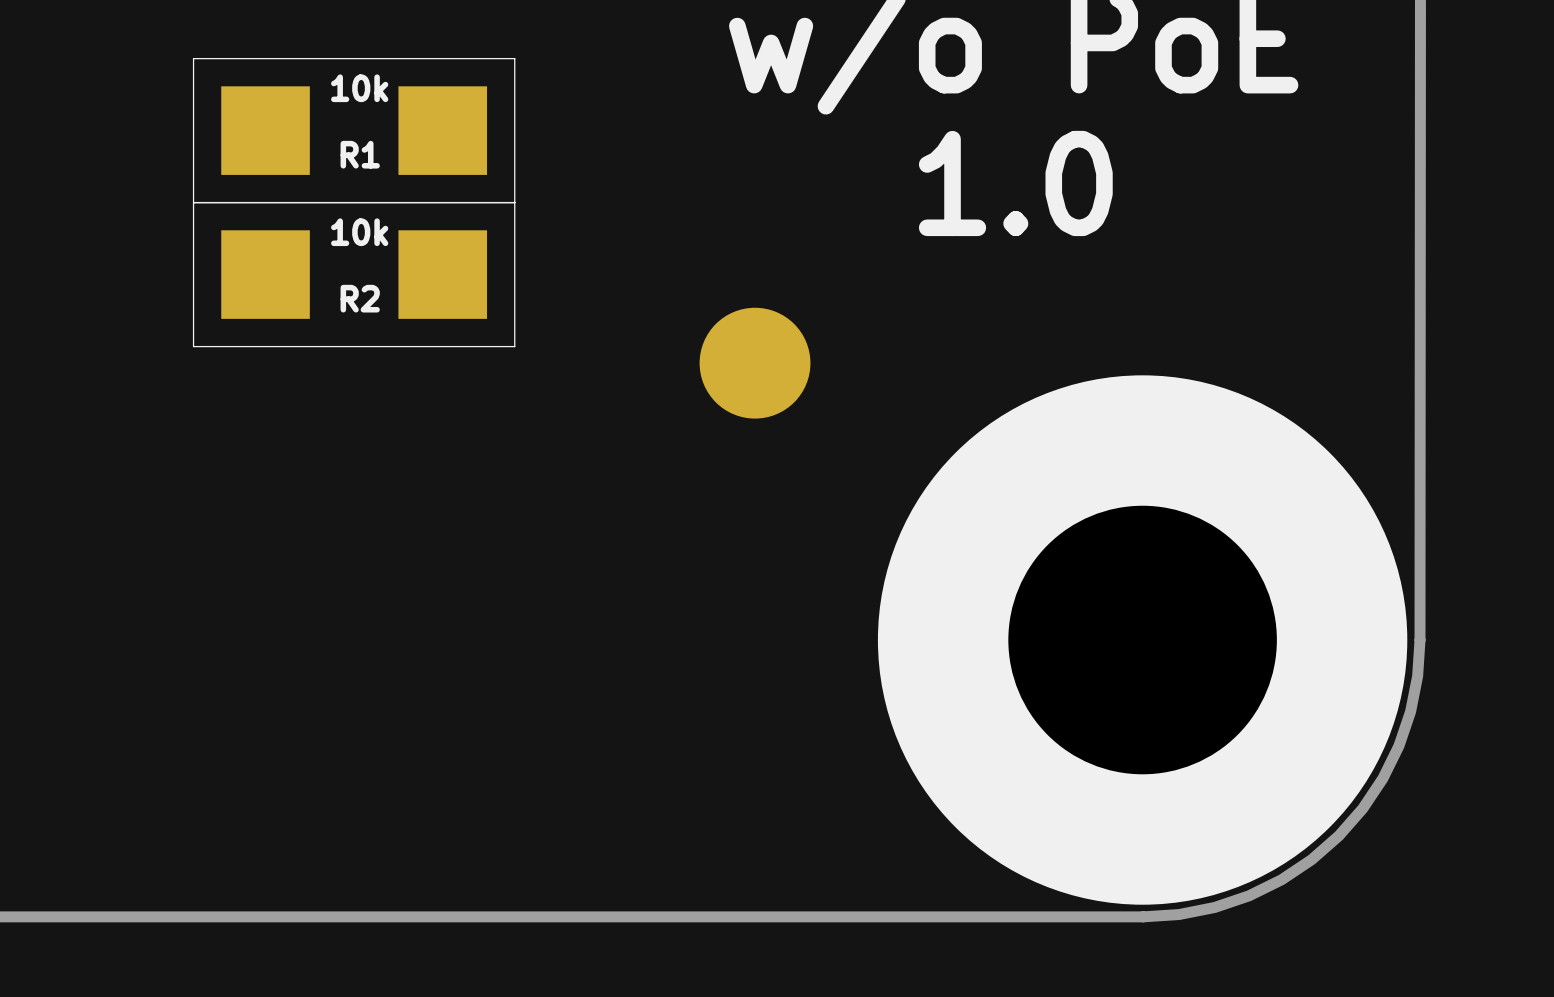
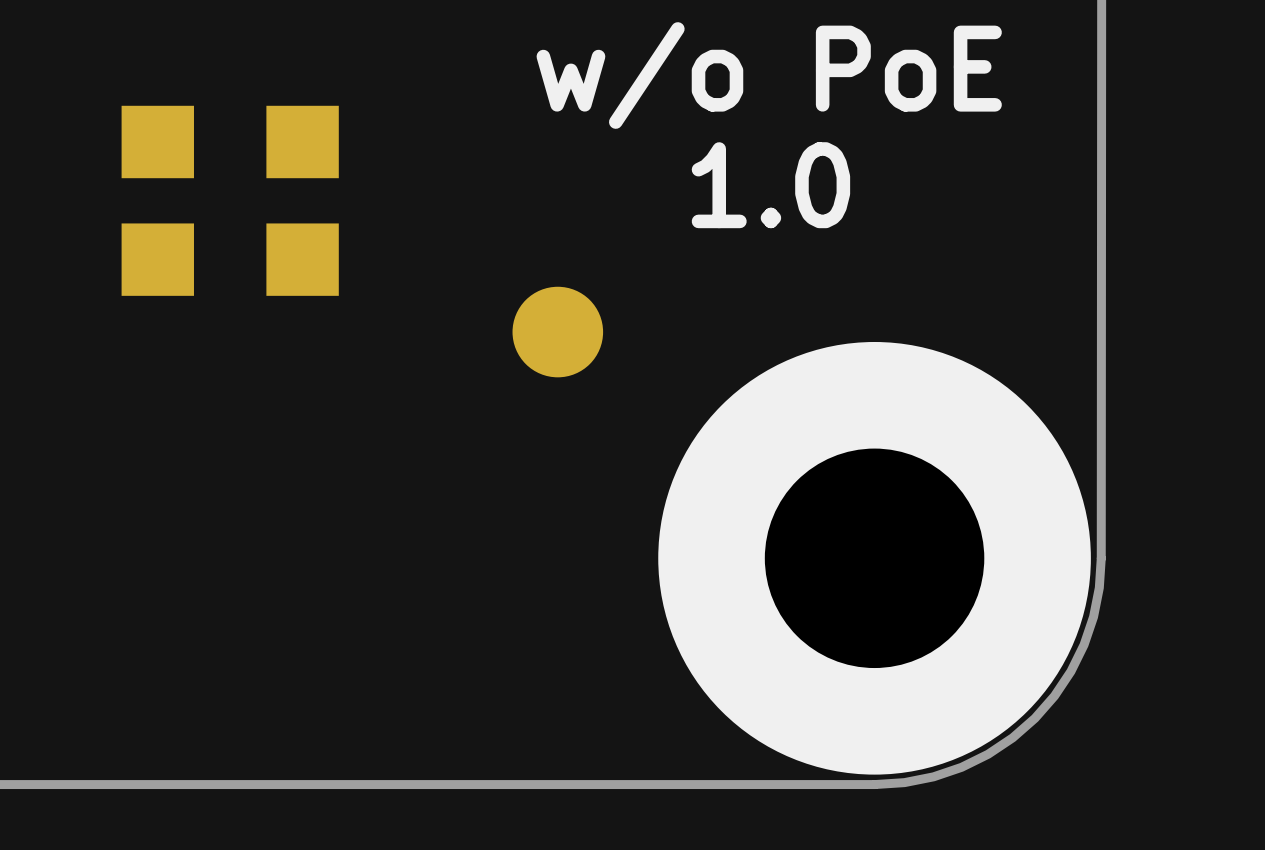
R1: 10k (354, 130) -> none
R2: 10k (354, 274) -> none

